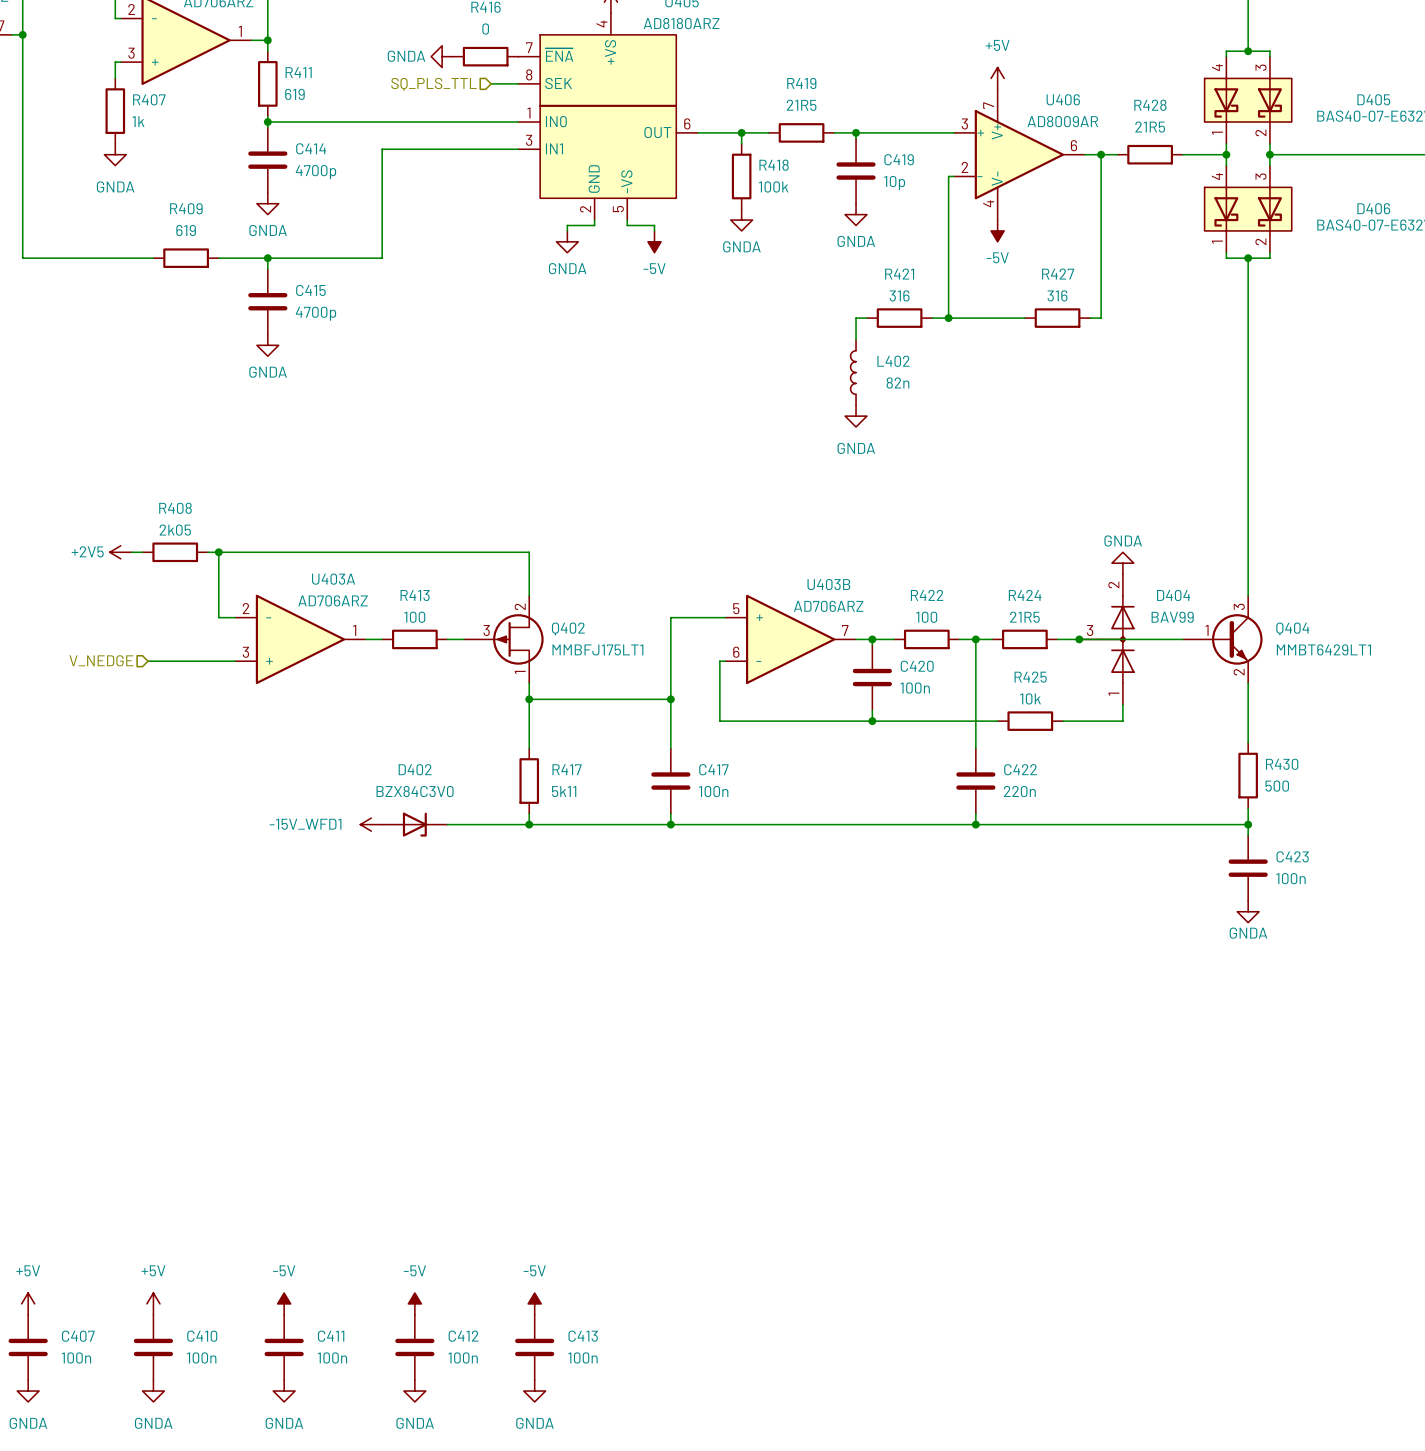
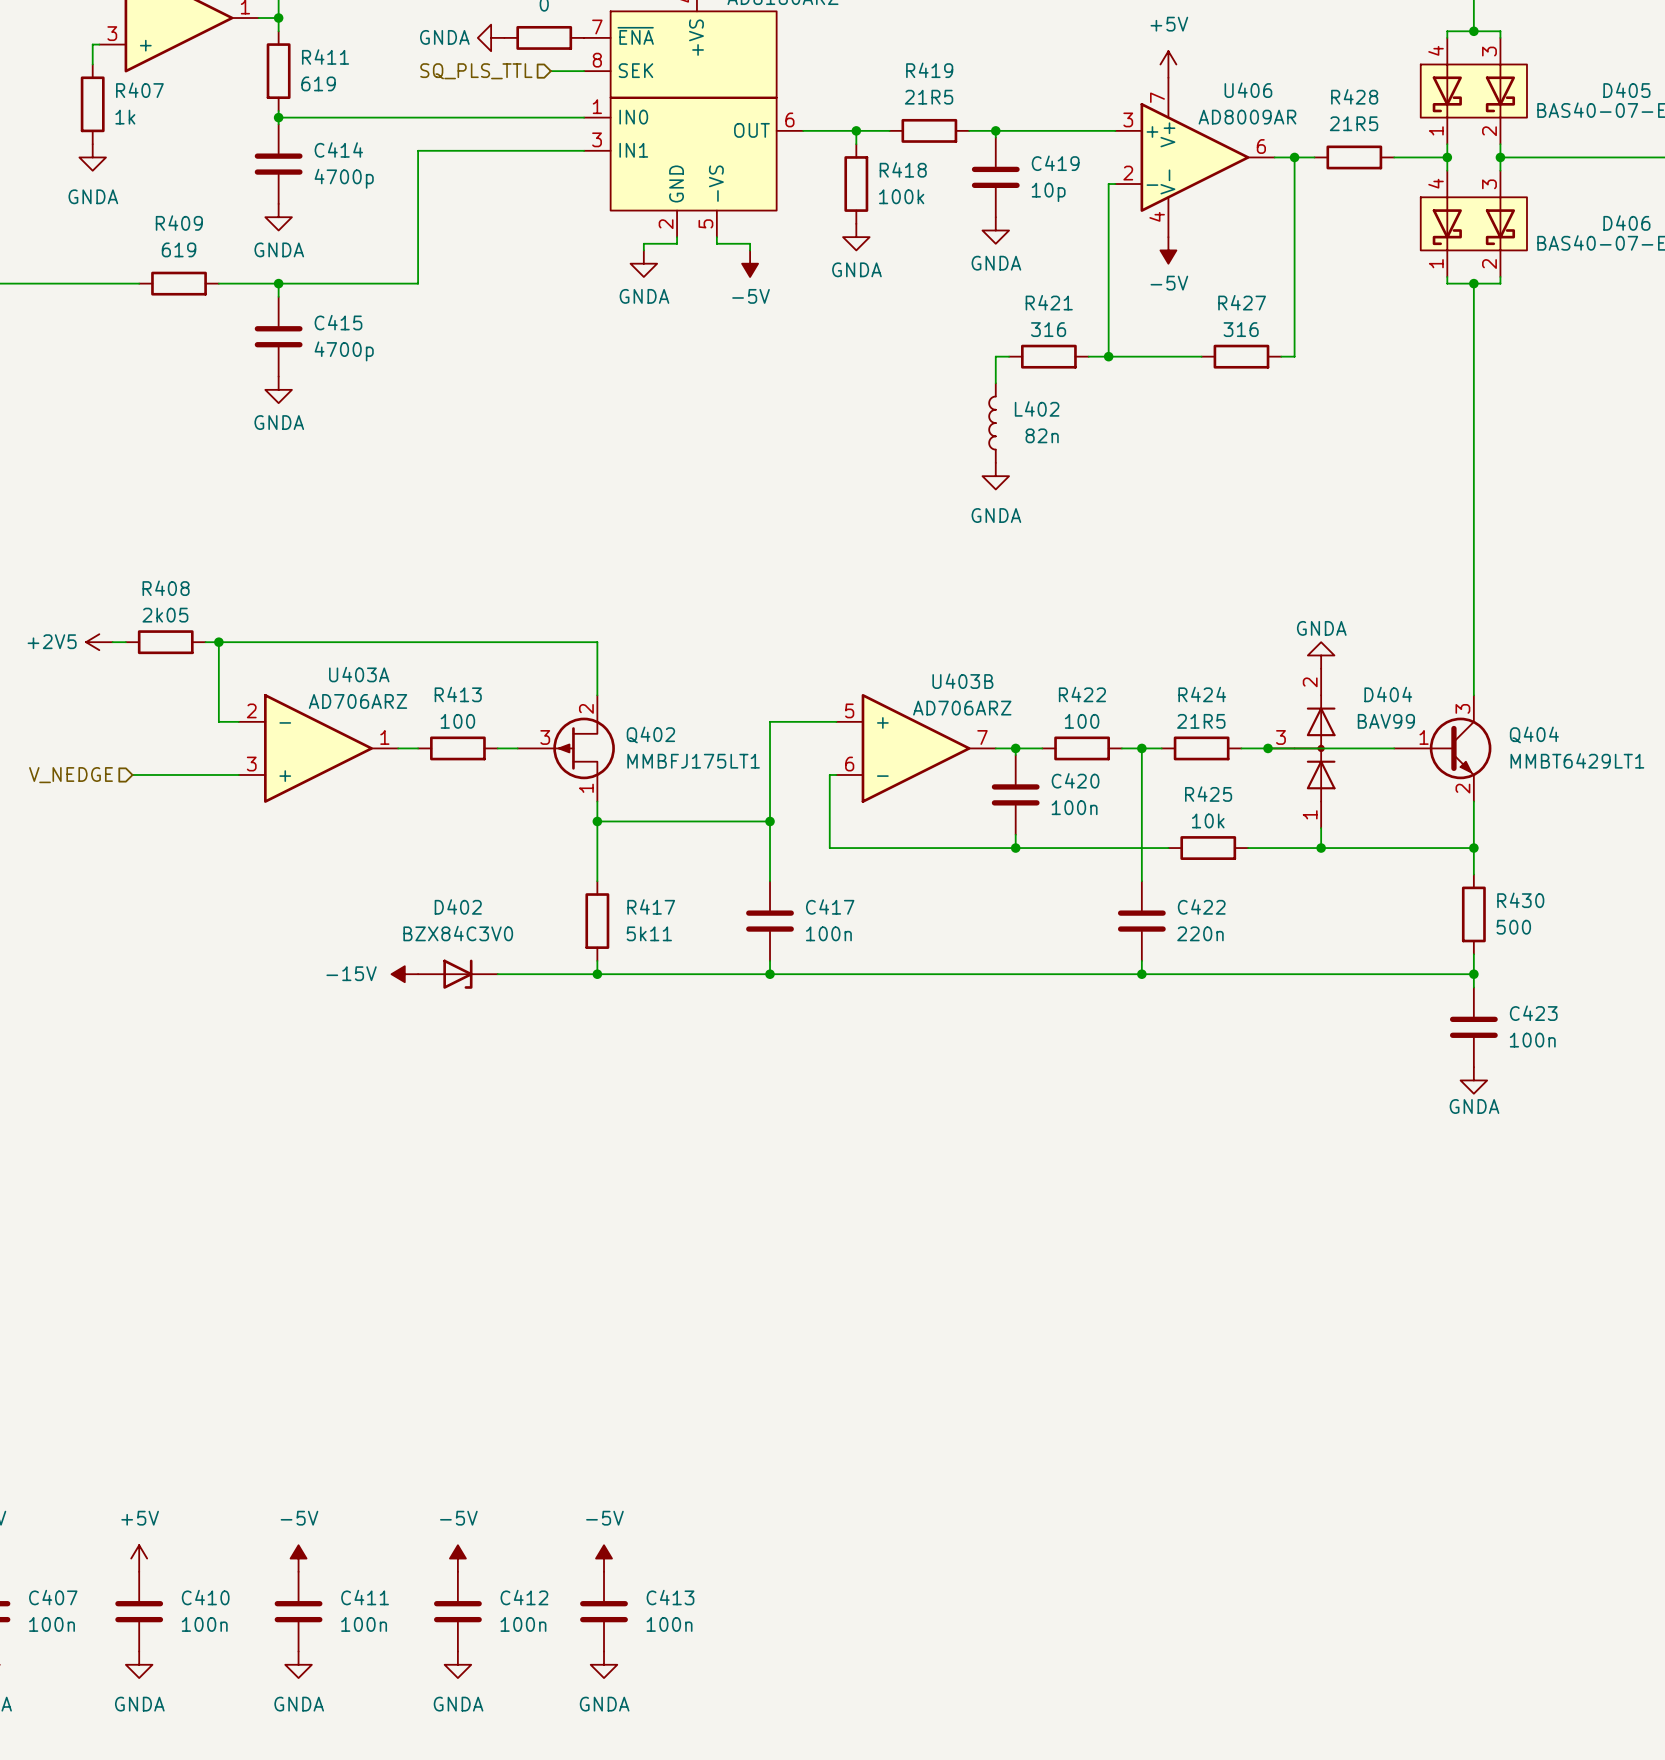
wire: none -> (1321, 848) (1473, 848)
junction: none -> (1321, 848)
junction: none -> (1473, 848)
power symbol: -15V_WFD1 (371, 824) -> -15V (404, 974)

